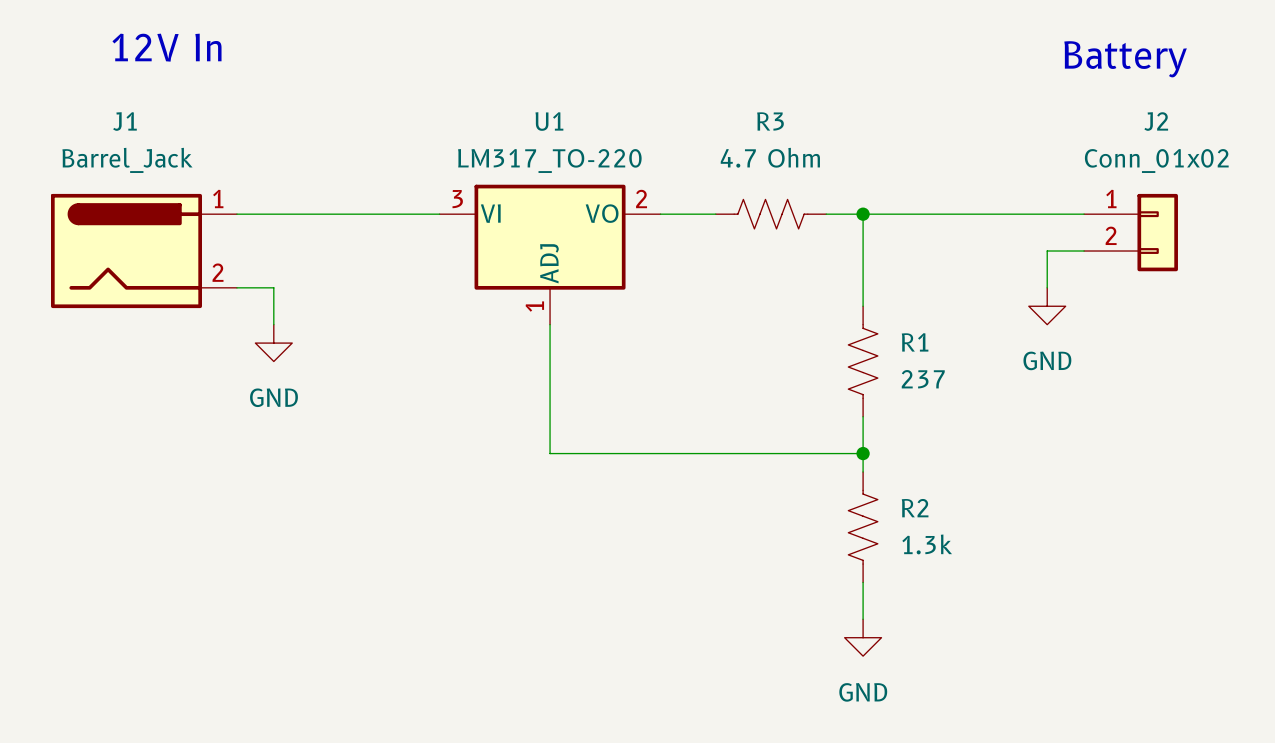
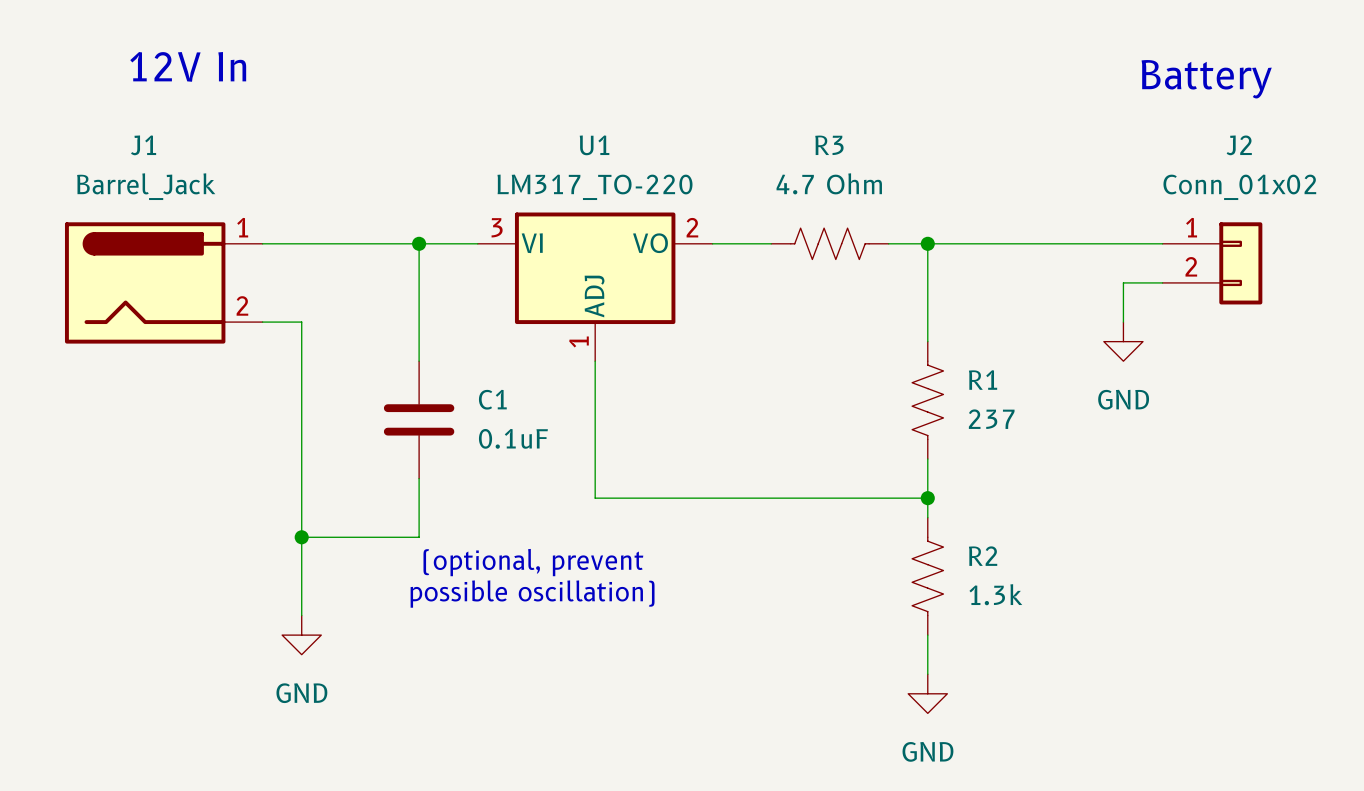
wire: none -> (419, 243) (419, 361)
junction: none -> (419, 243)
wire: none -> (301, 361) (301, 615)
power symbol position: GND (273, 343) -> GND (301, 635)
C1: none -> 0.1uF (419, 419)
wire: none -> (419, 478) (419, 537) (301, 537)
junction: none -> (301, 537)
text: none -> (optional, prevent (533, 562)
text: none -> possible oscillation) (532, 594)

